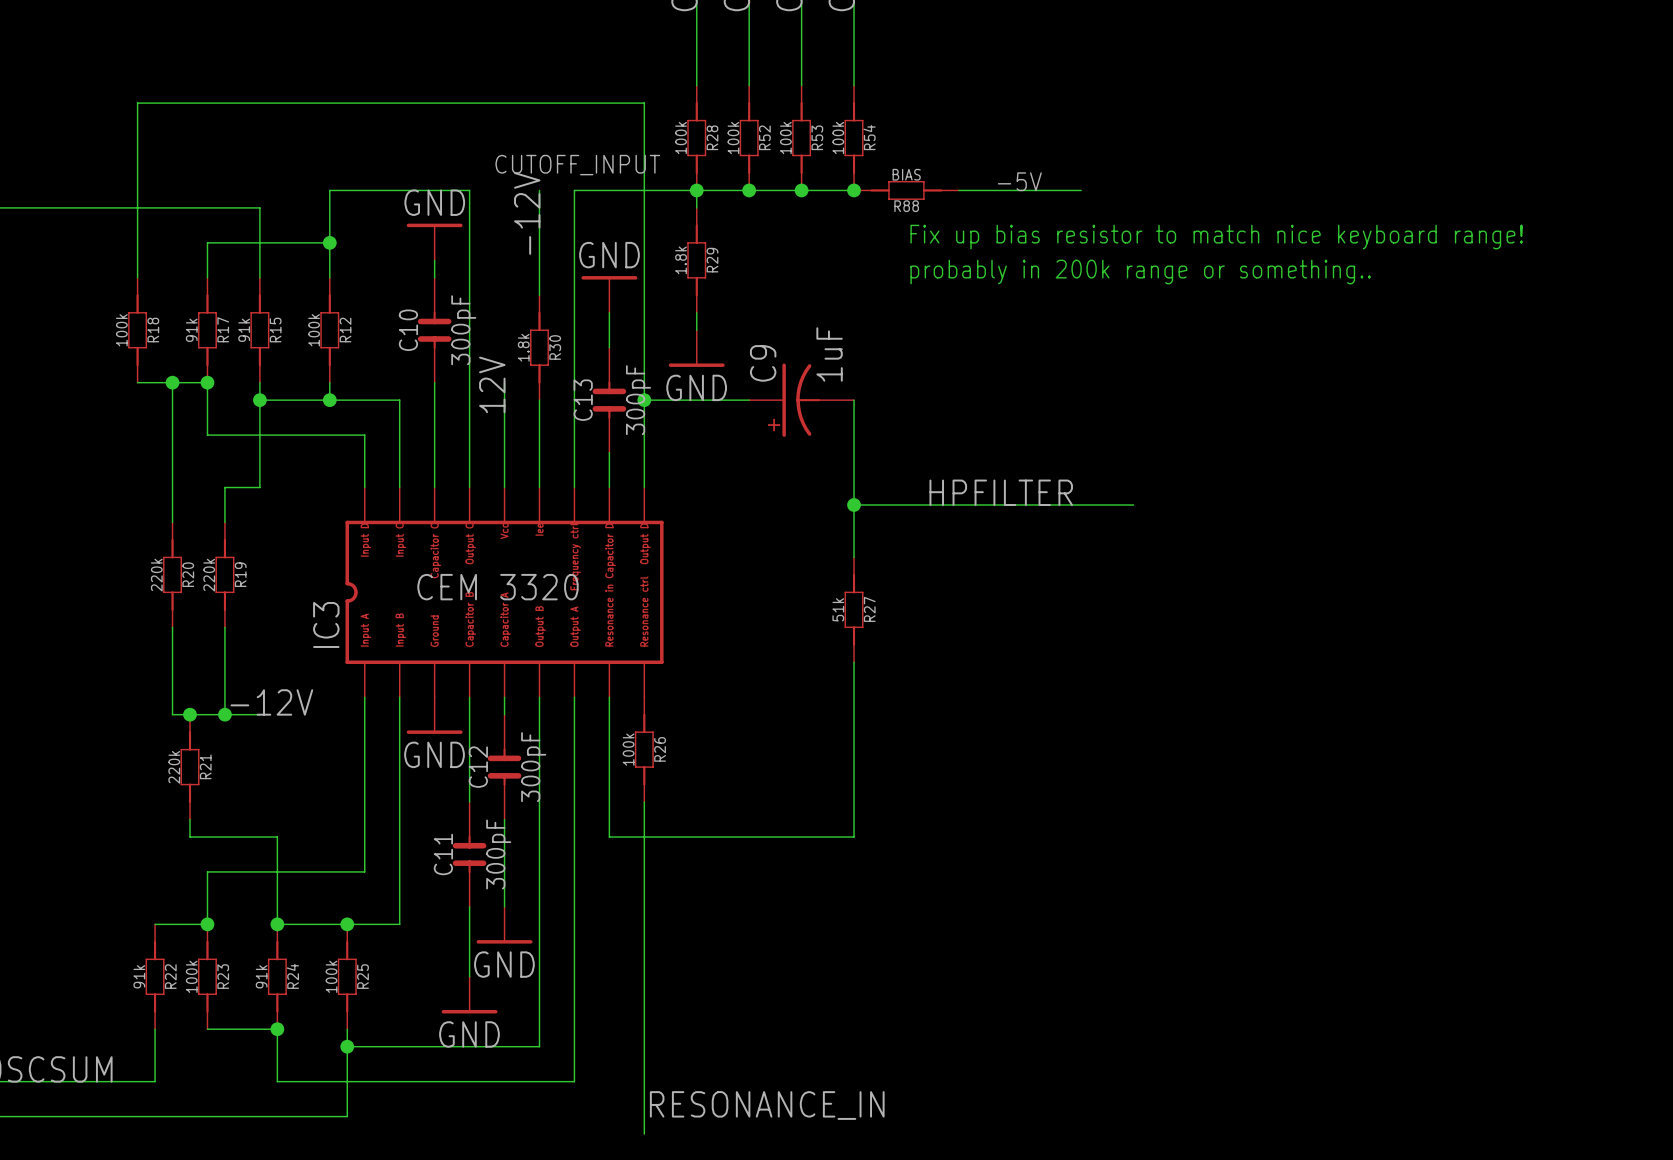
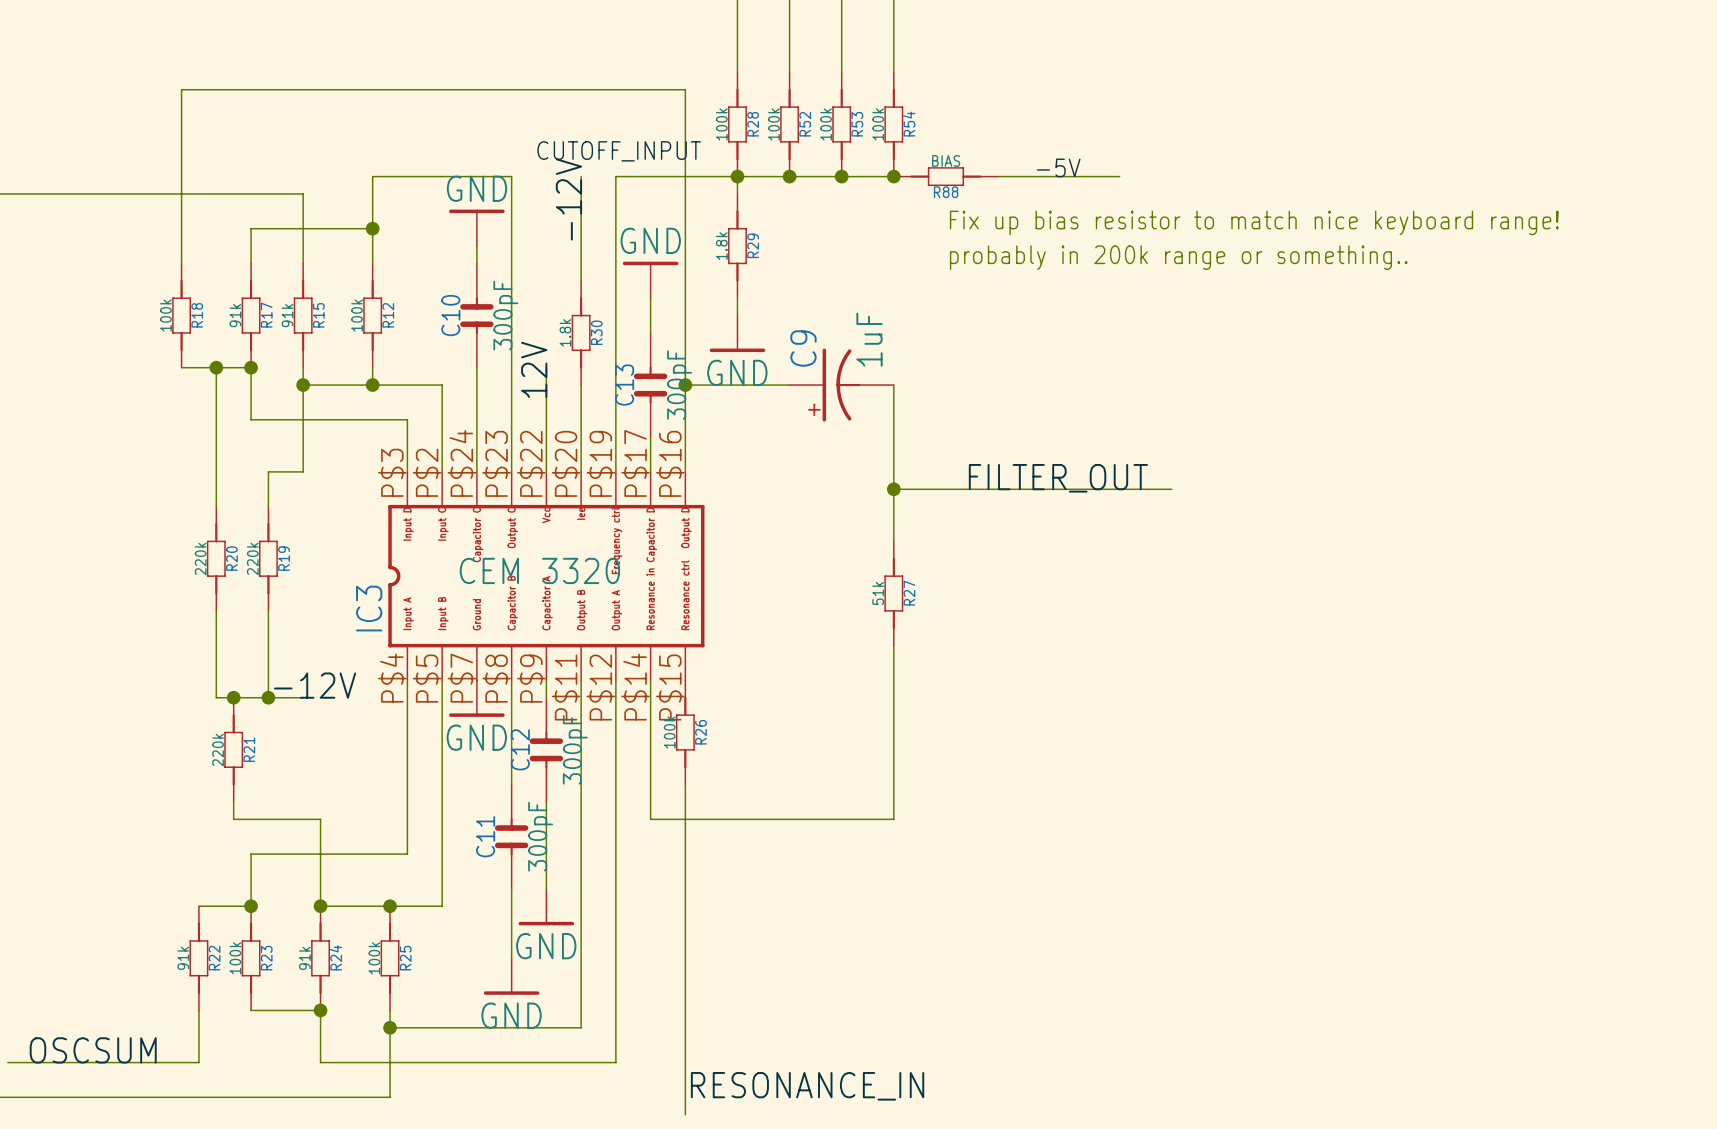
IC3 symbol: [345, 487, 664, 698] -> [388, 471, 705, 681]
label: HPFILTER (1001, 492) -> FILTER_OUT (1058, 478)

